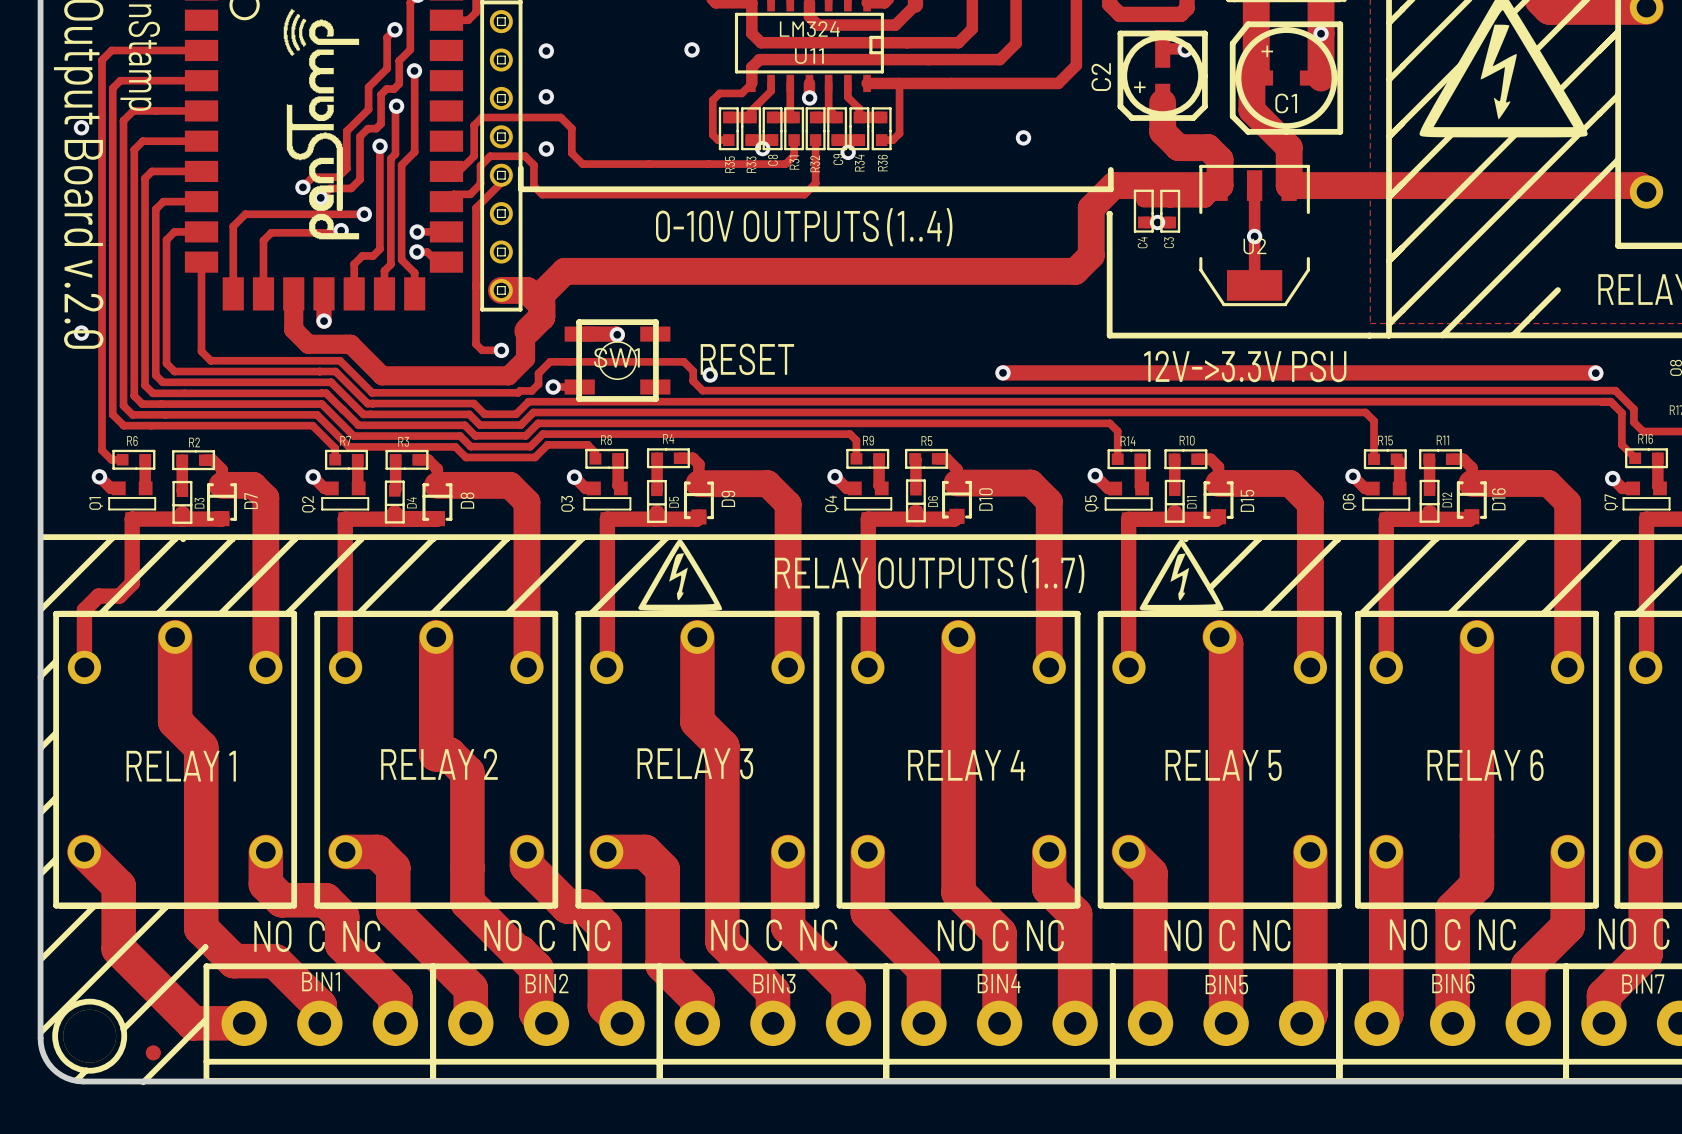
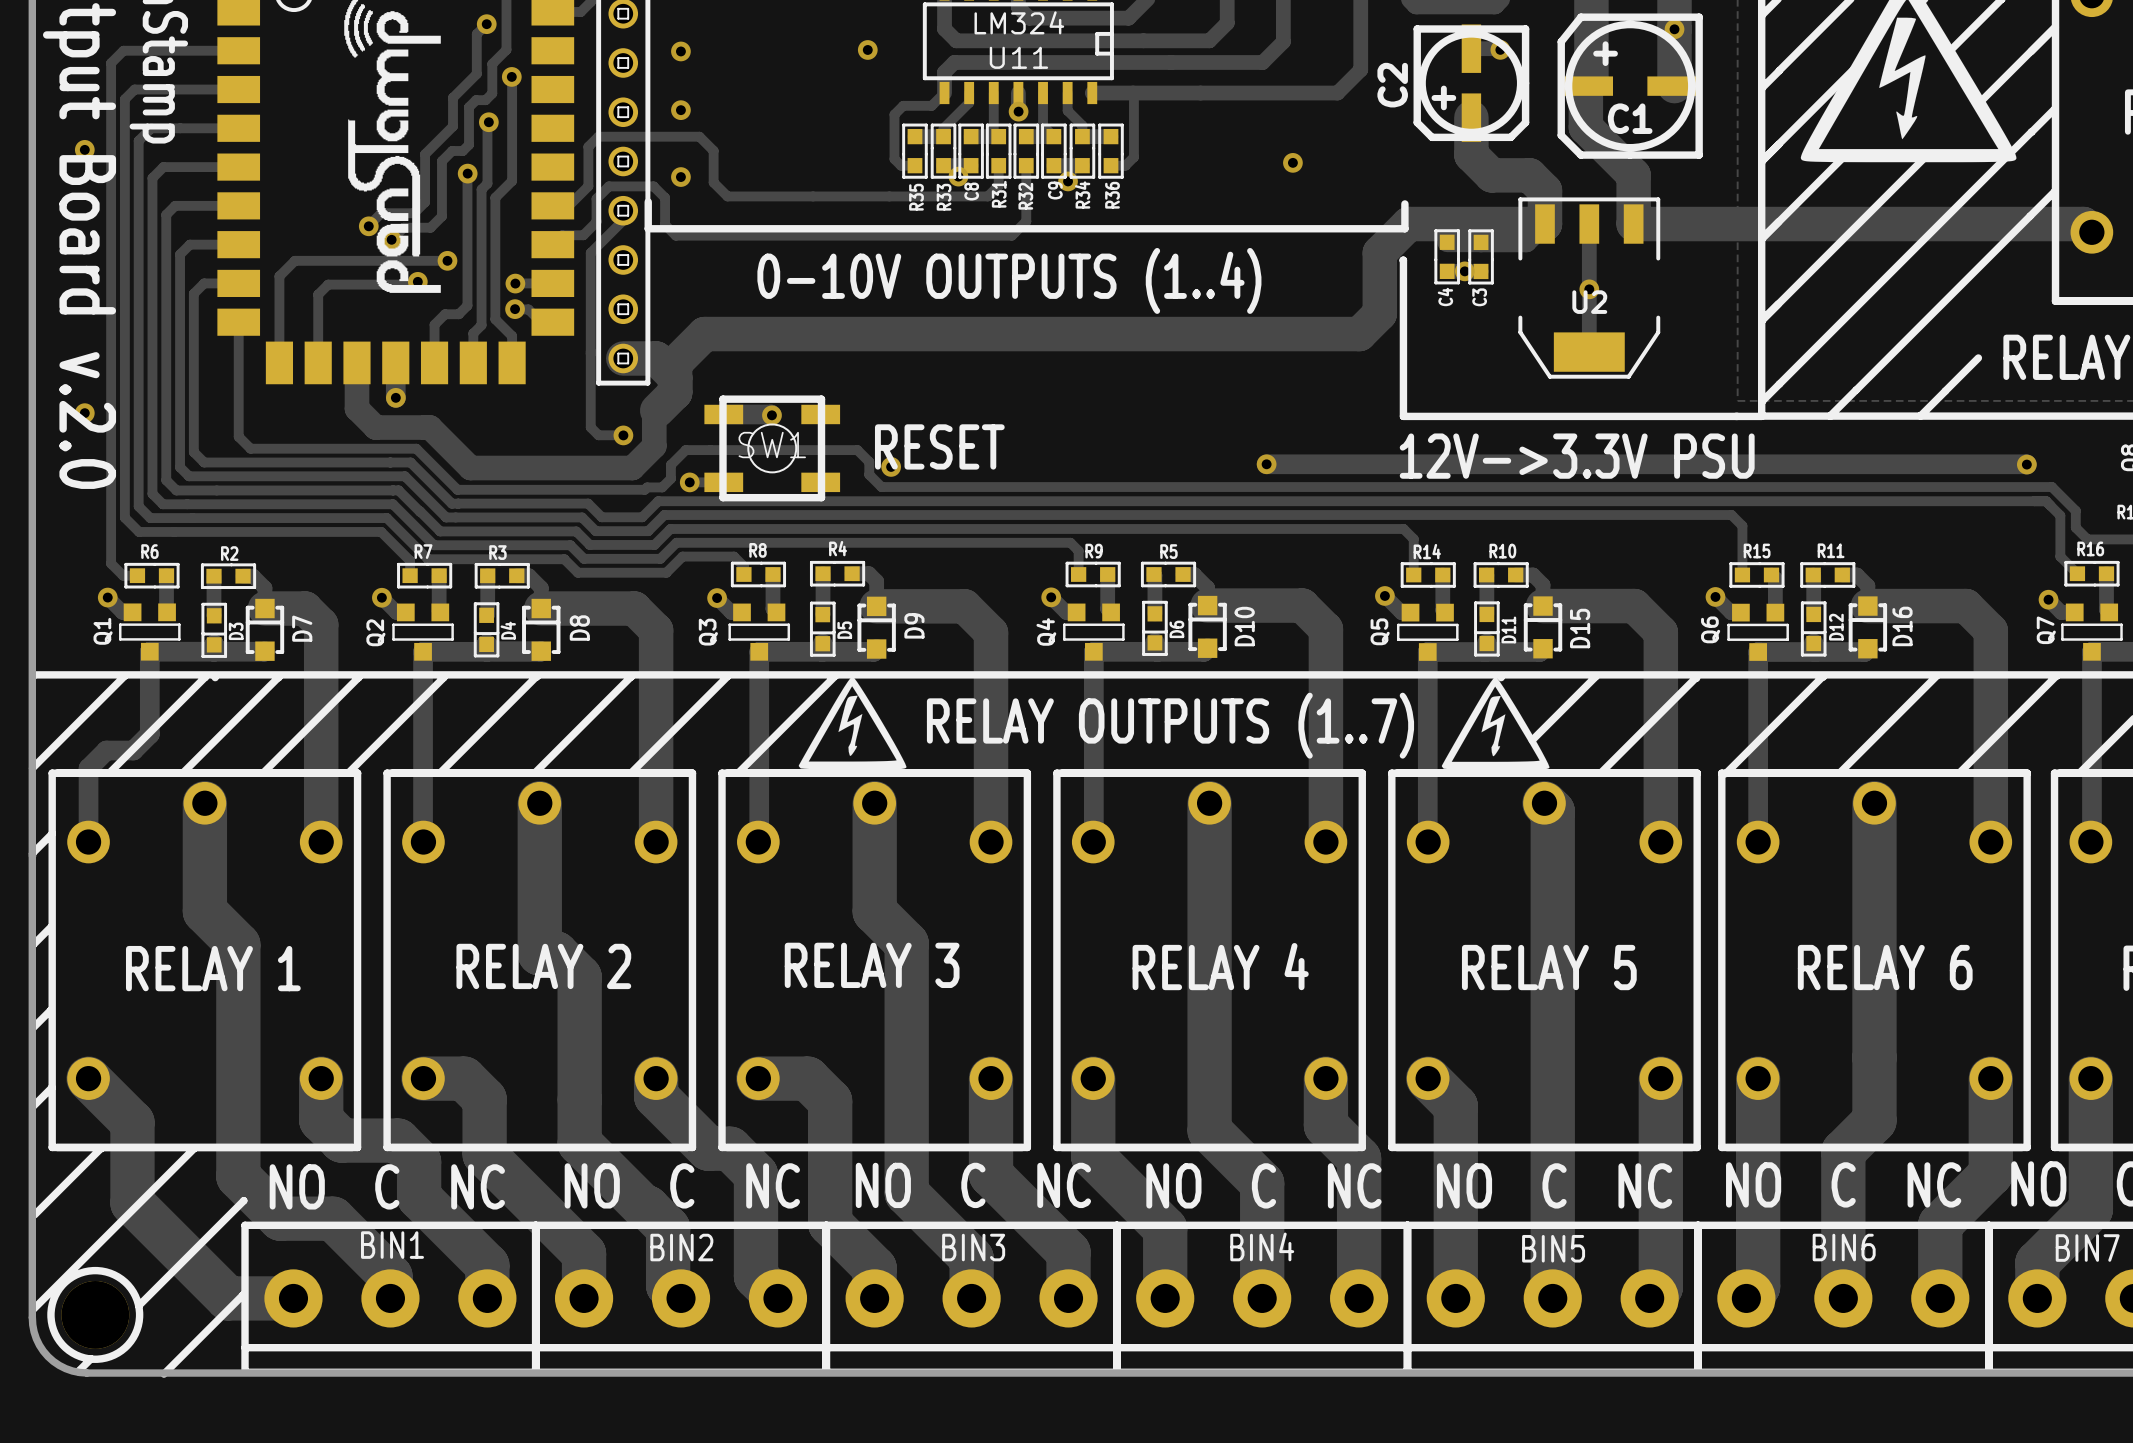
part: (153, 1052) -> none

